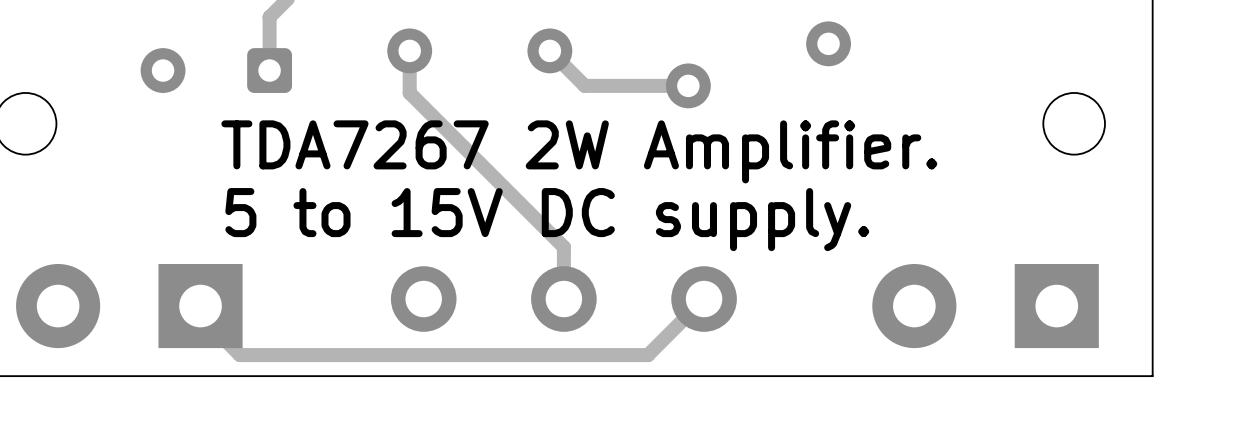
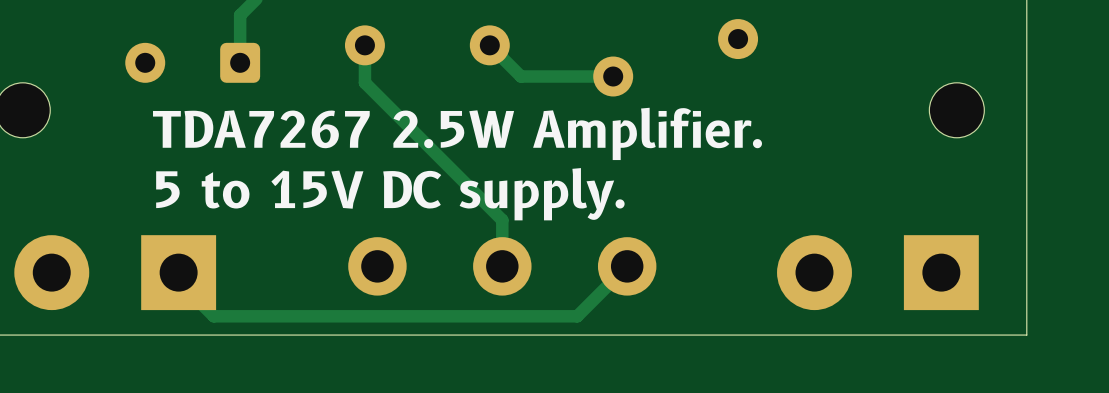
text: TDA7267 2W Amplifier. (579, 151) -> TDA7267 2.5W Amplifier. (457, 133)
text position: 5 to 15V DC supply. (547, 219) -> 5 to 15V DC supply. (390, 194)

